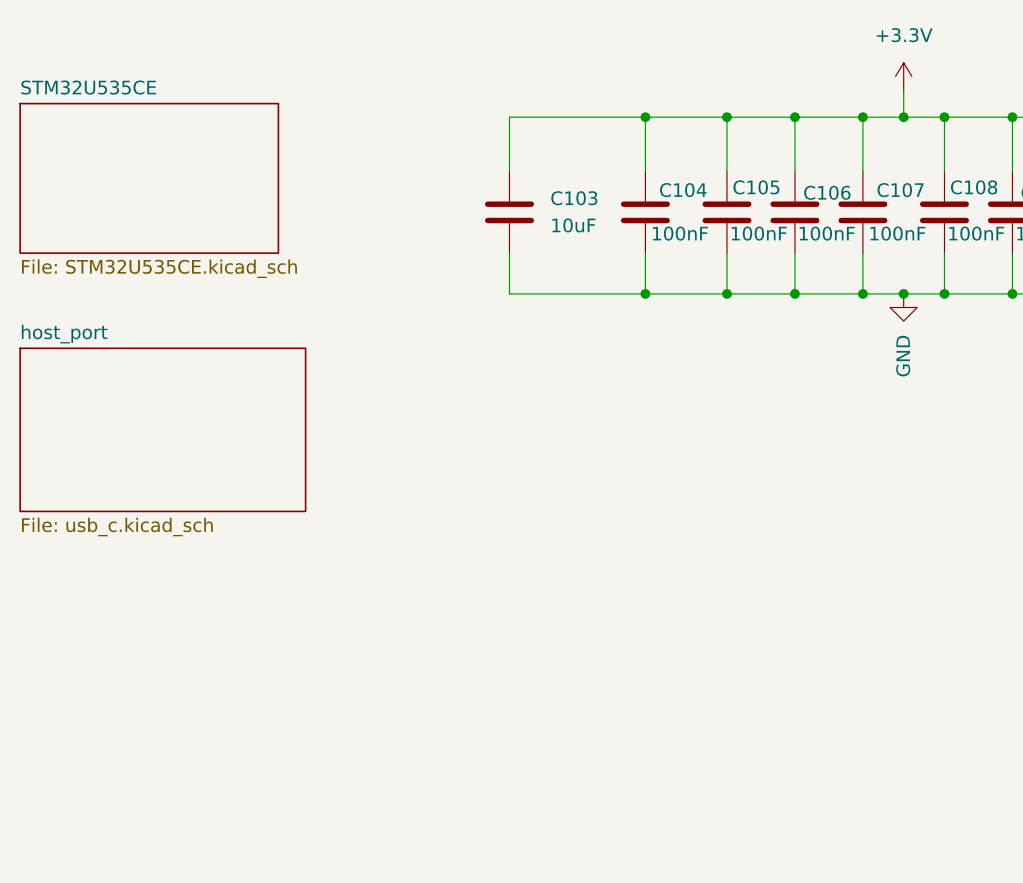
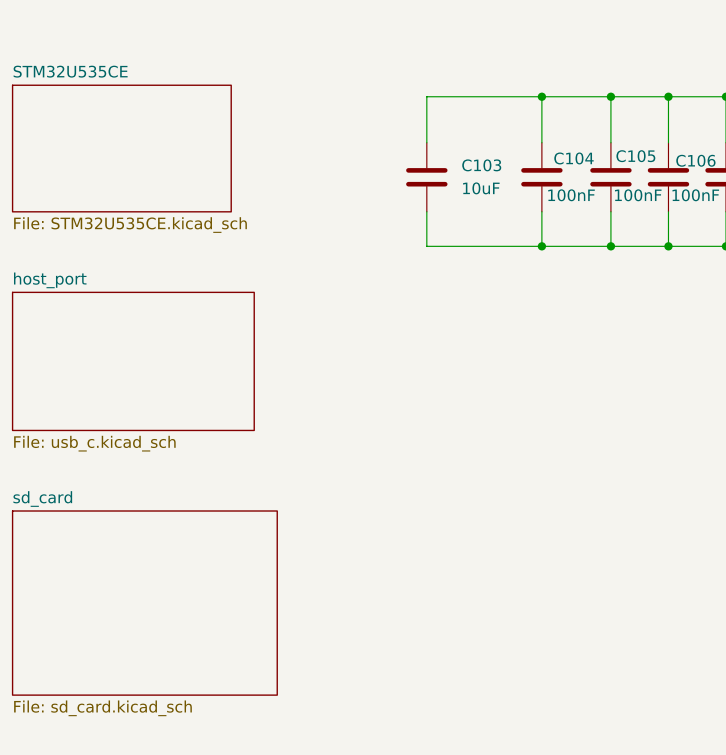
sheet sd_card: none -> File: sd_card.kicad_sch (144, 603)

